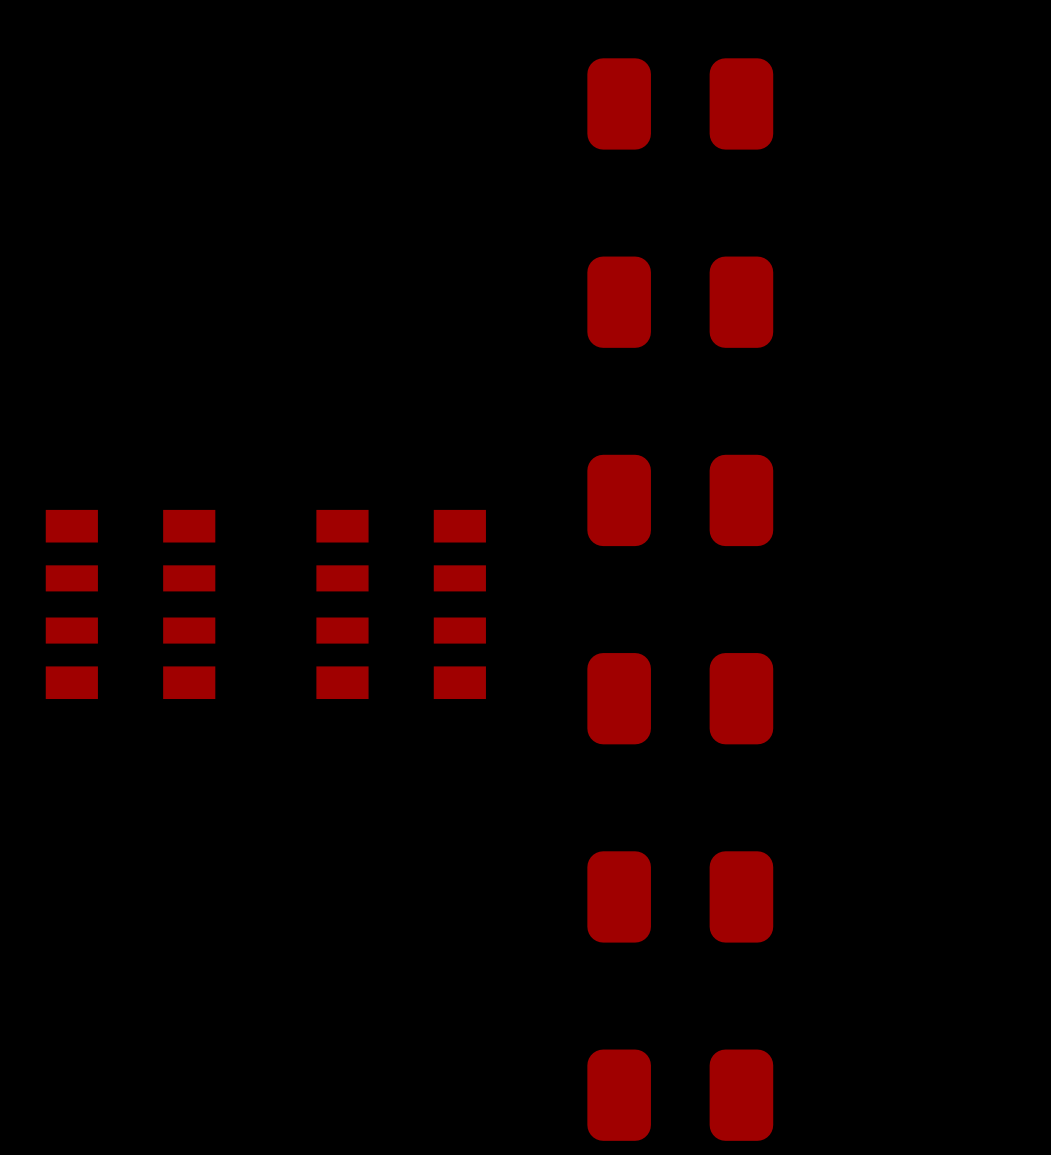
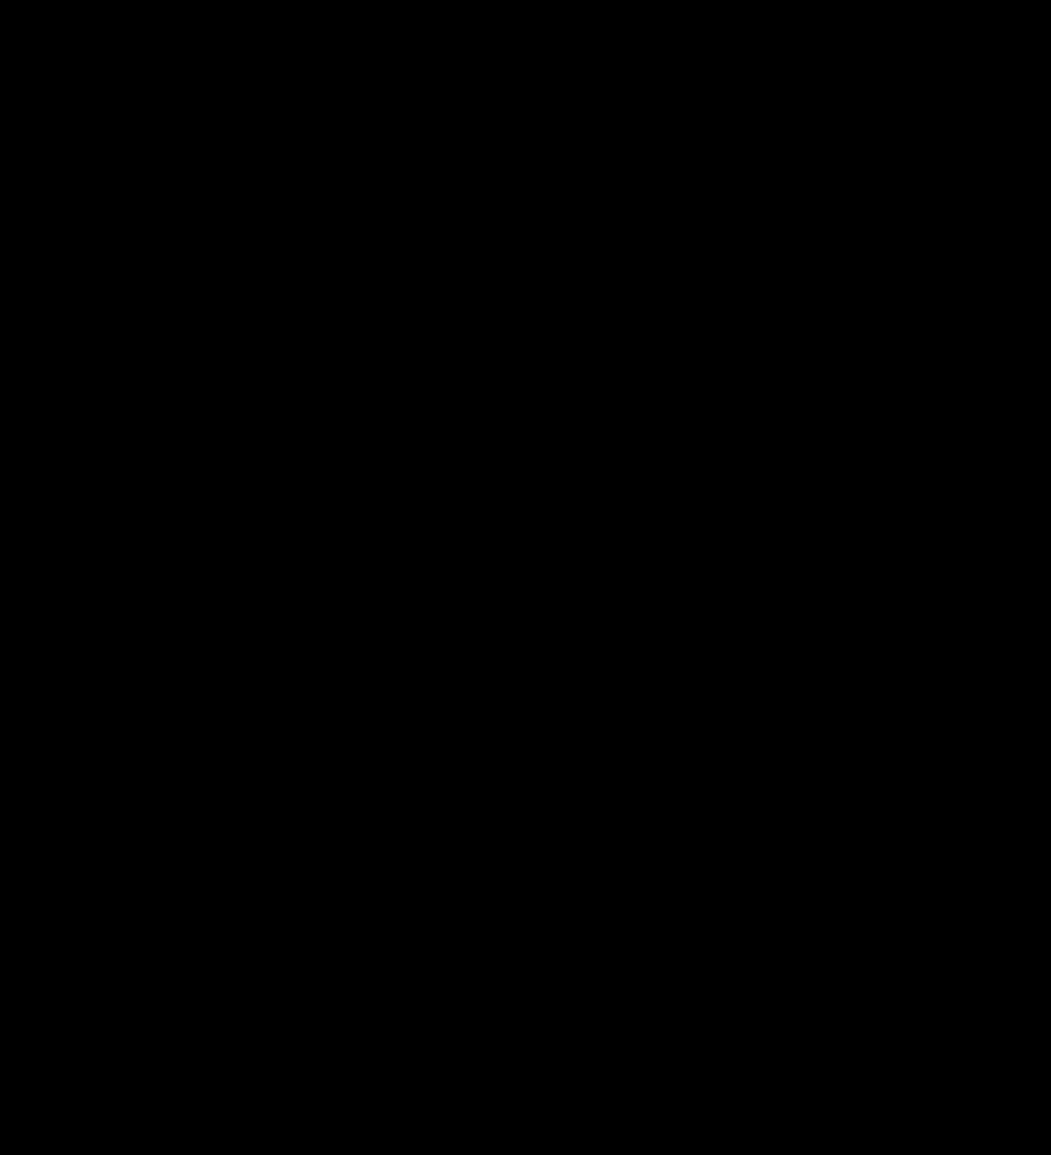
part: (680, 103) -> none
part: (680, 302) -> none
part: (680, 500) -> none
part: (130, 604) -> none
part: (401, 604) -> none
part: (680, 698) -> none
part: (680, 896) -> none
part: (680, 1095) -> none

